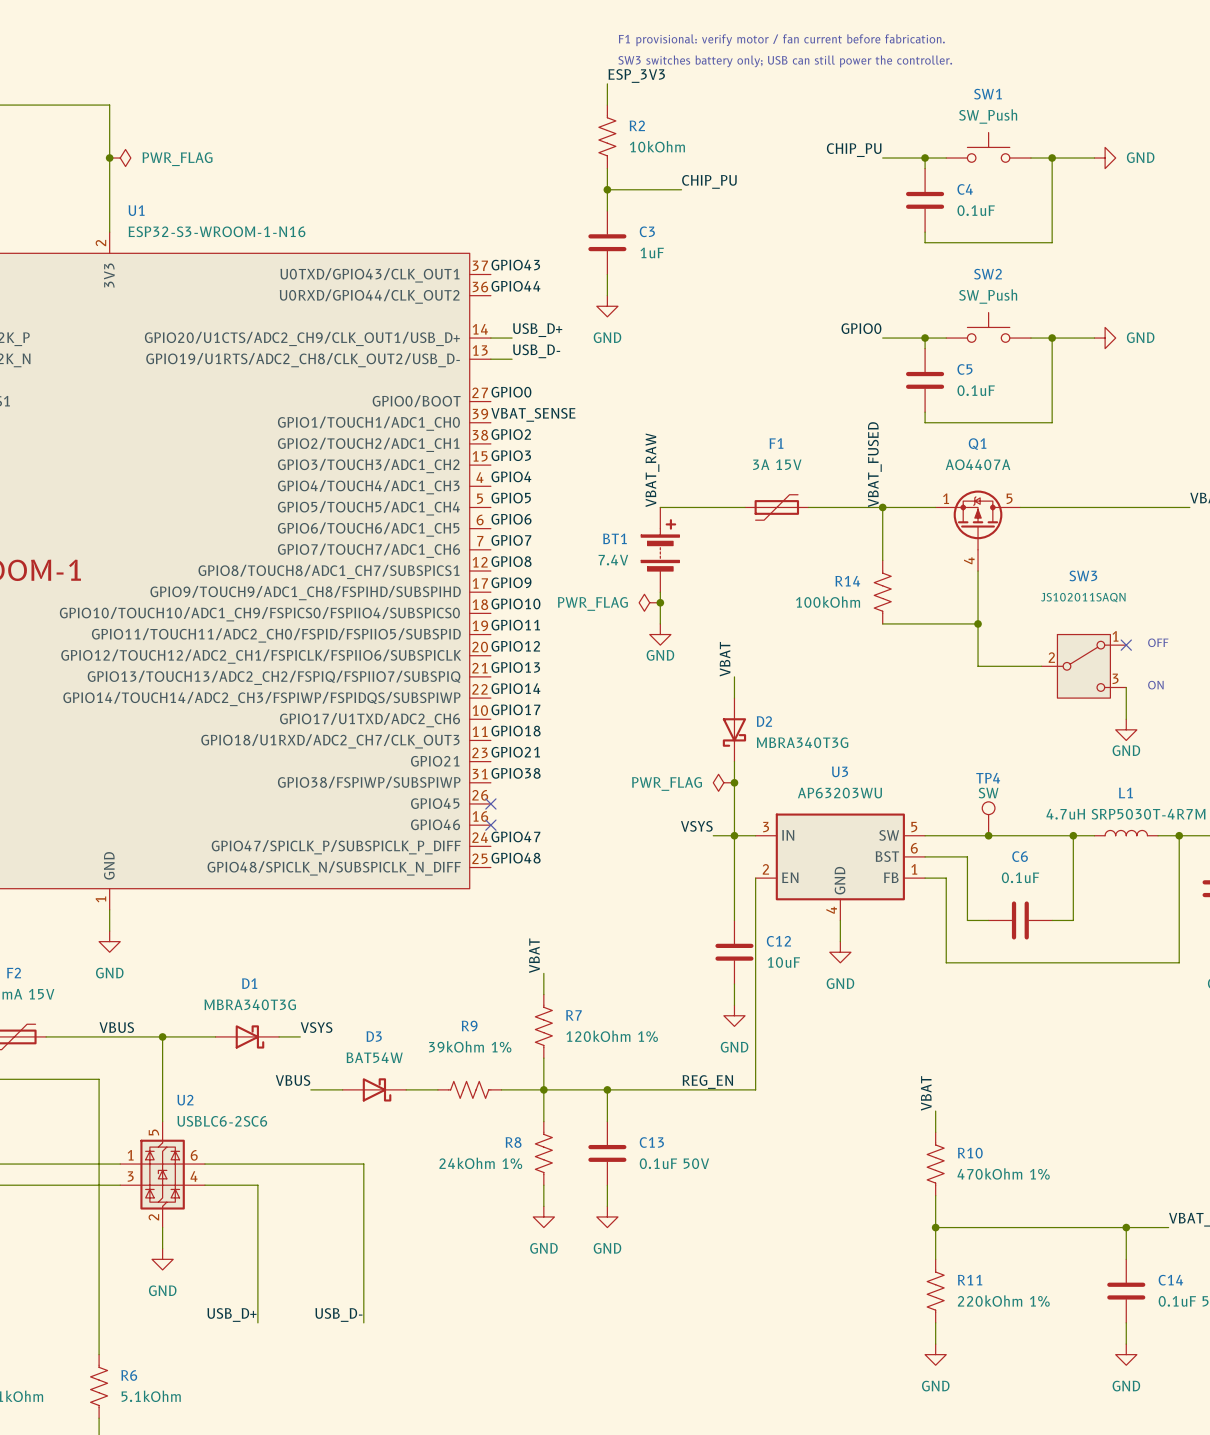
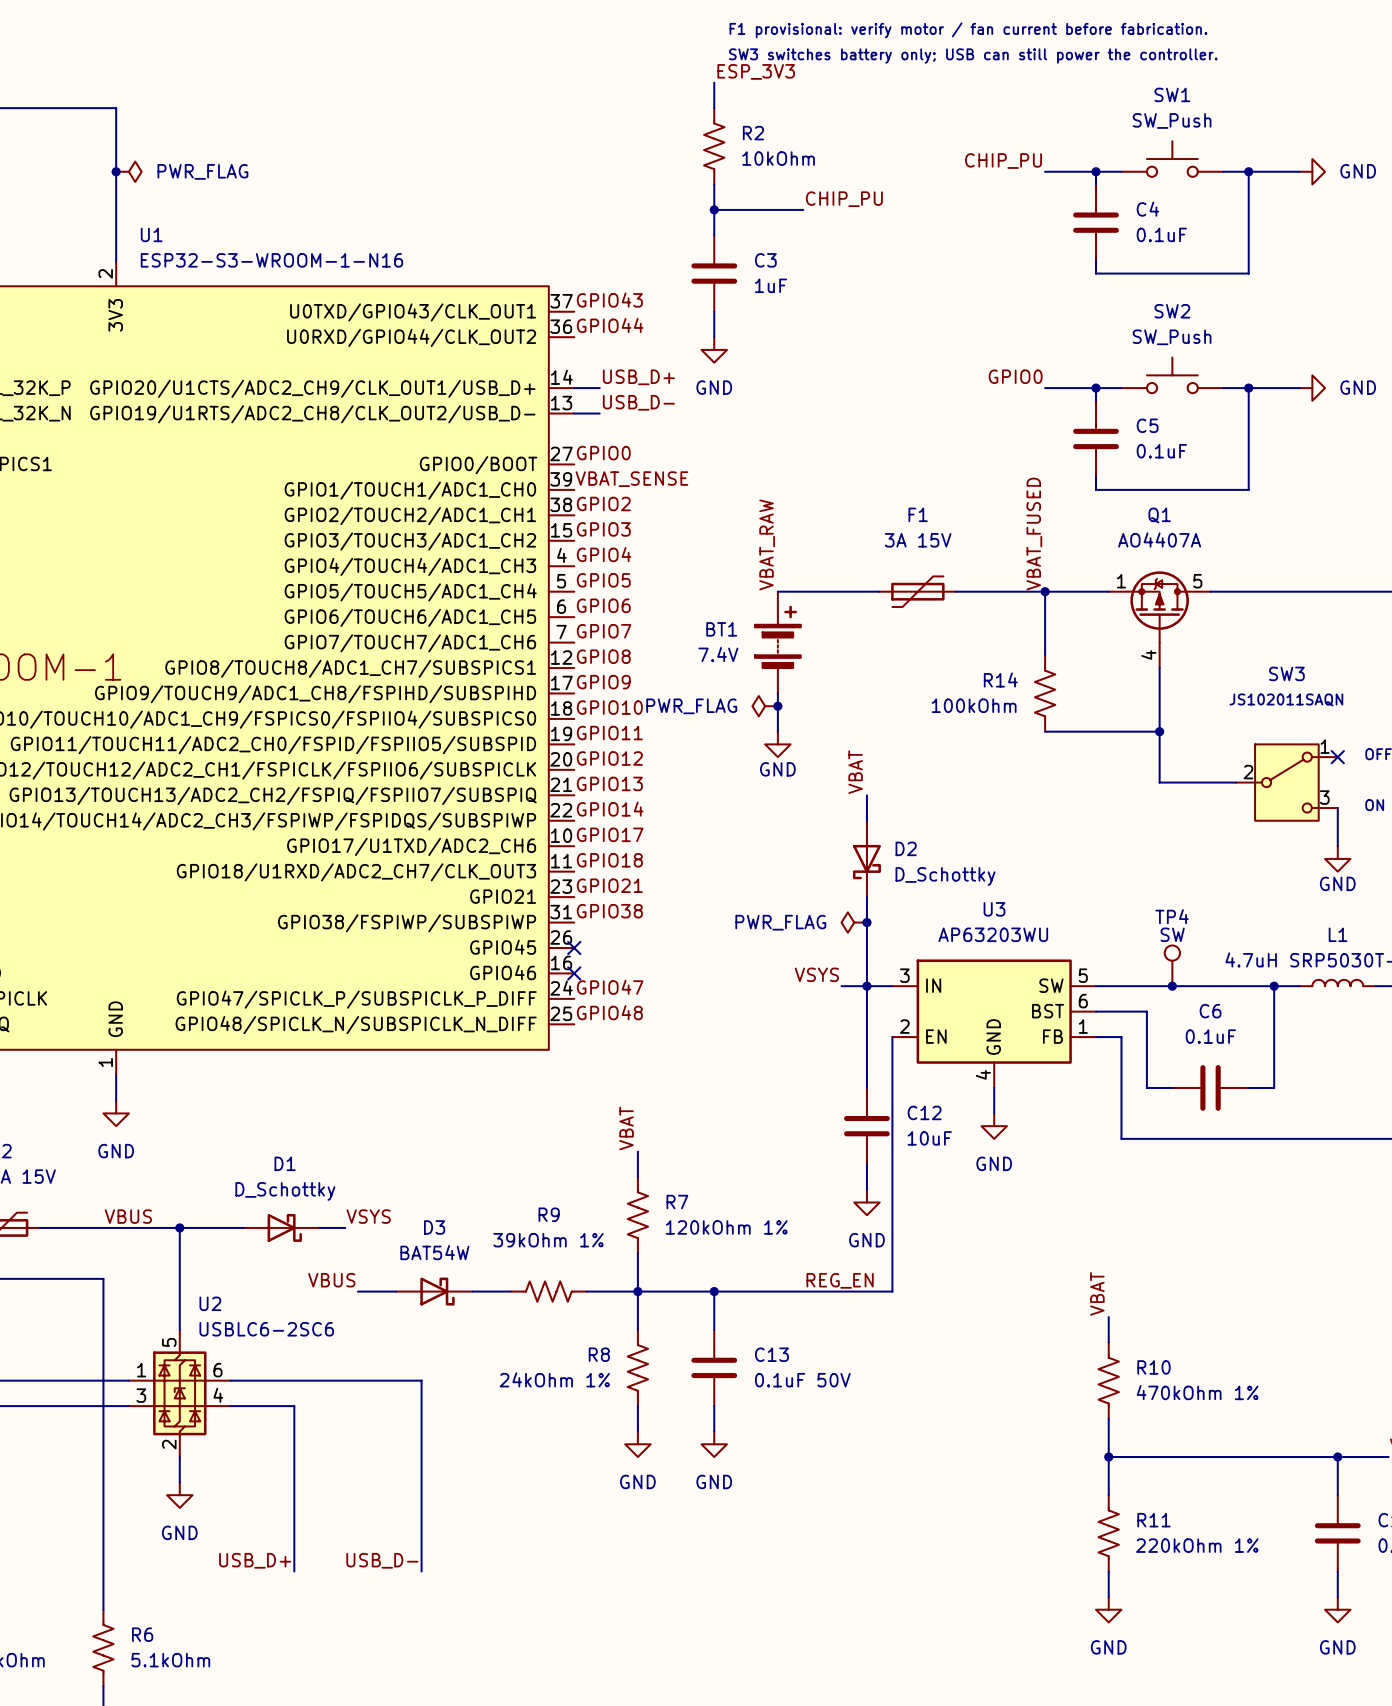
D2 value: MBRA340T3G (802, 742) -> D_Schottky (945, 876)
D1 value: MBRA340T3G (250, 1004) -> D_Schottky (285, 1191)

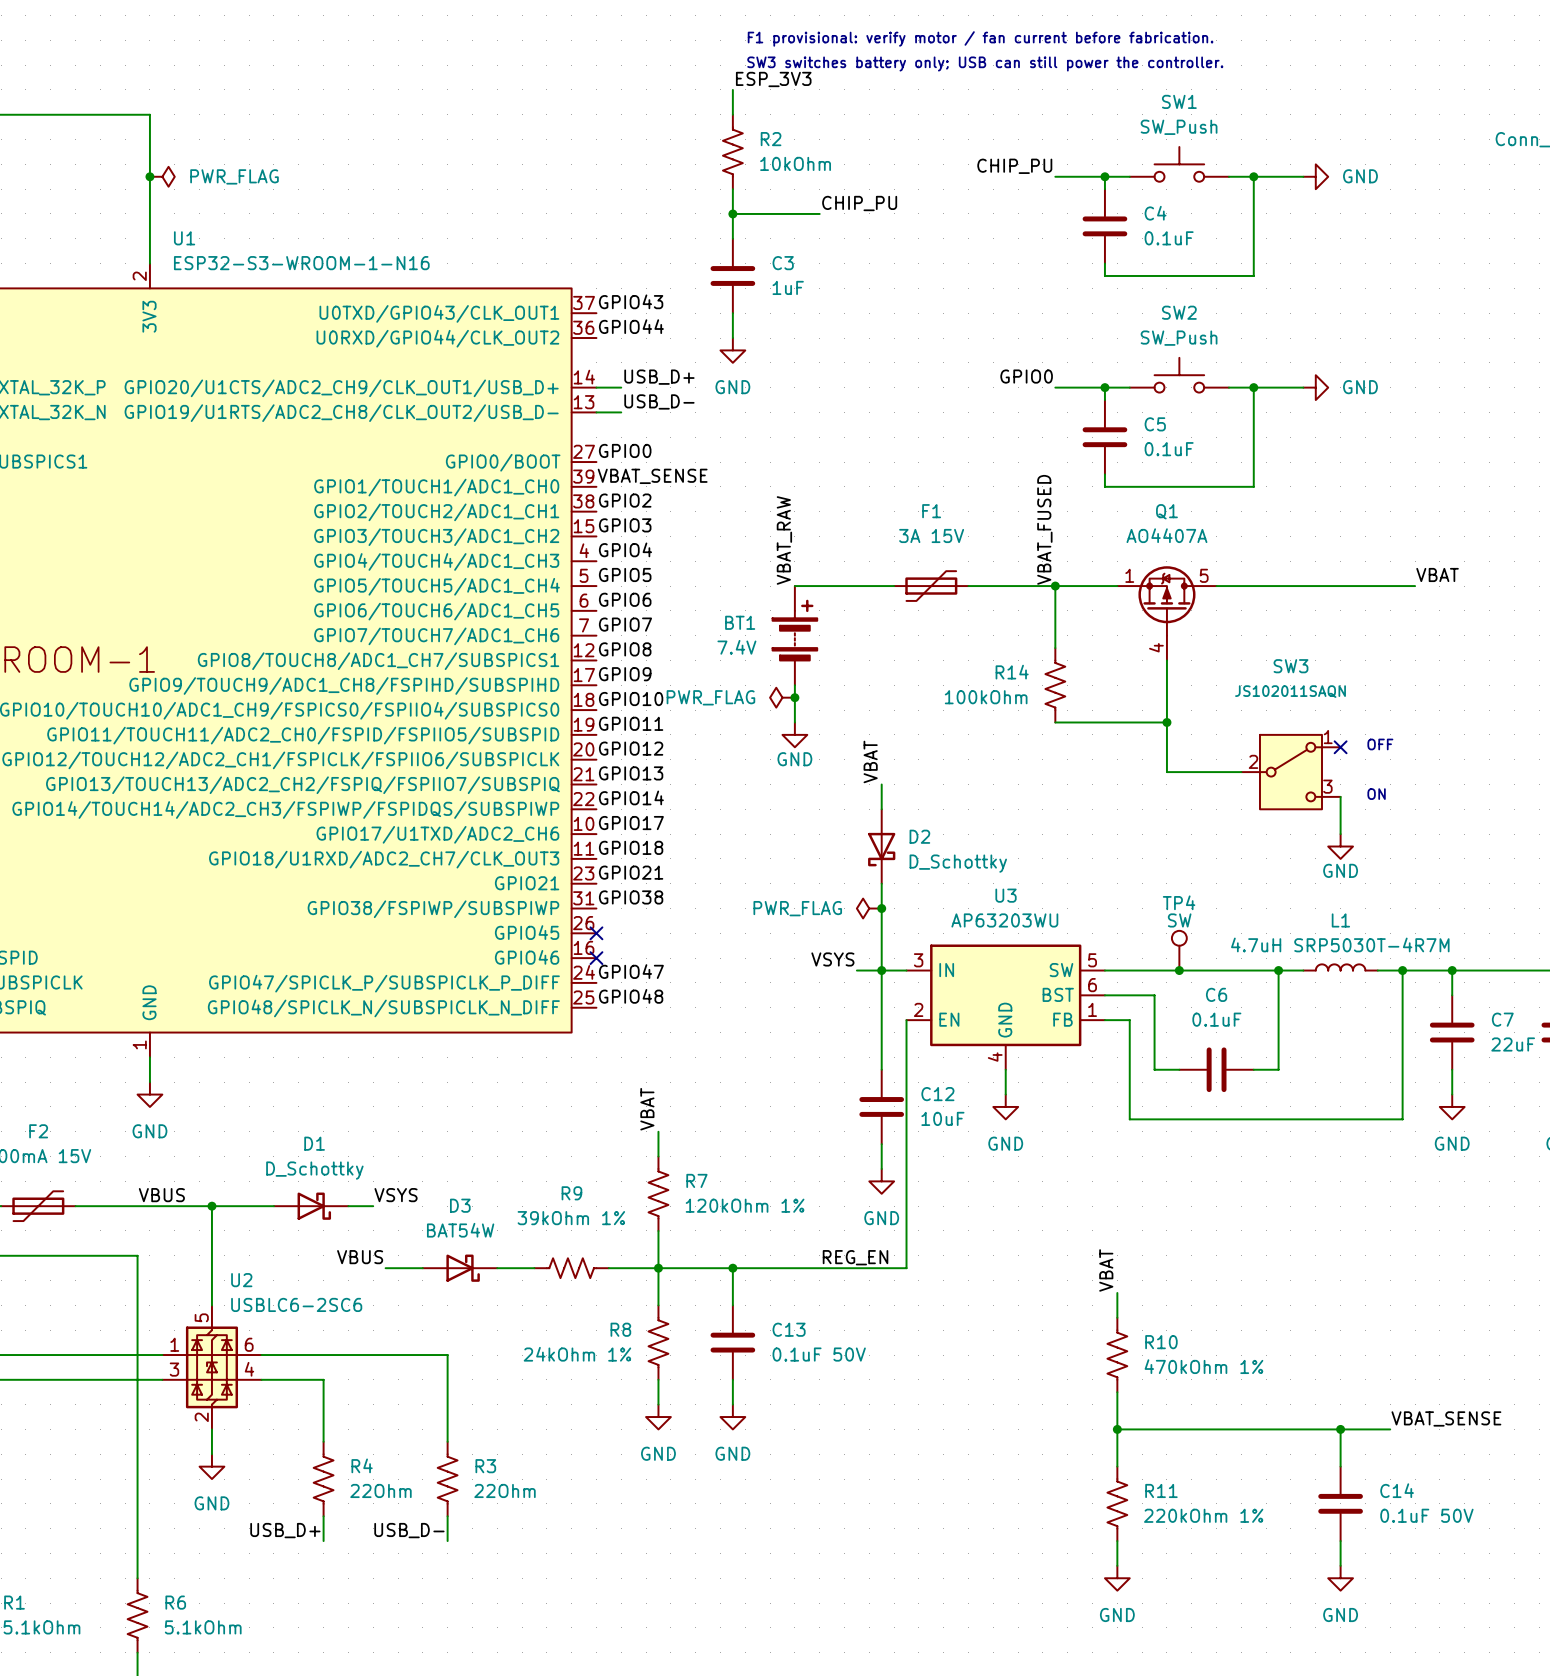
R4: none -> 22Ohm (323, 1479)
R3: none -> 22Ohm (447, 1479)

